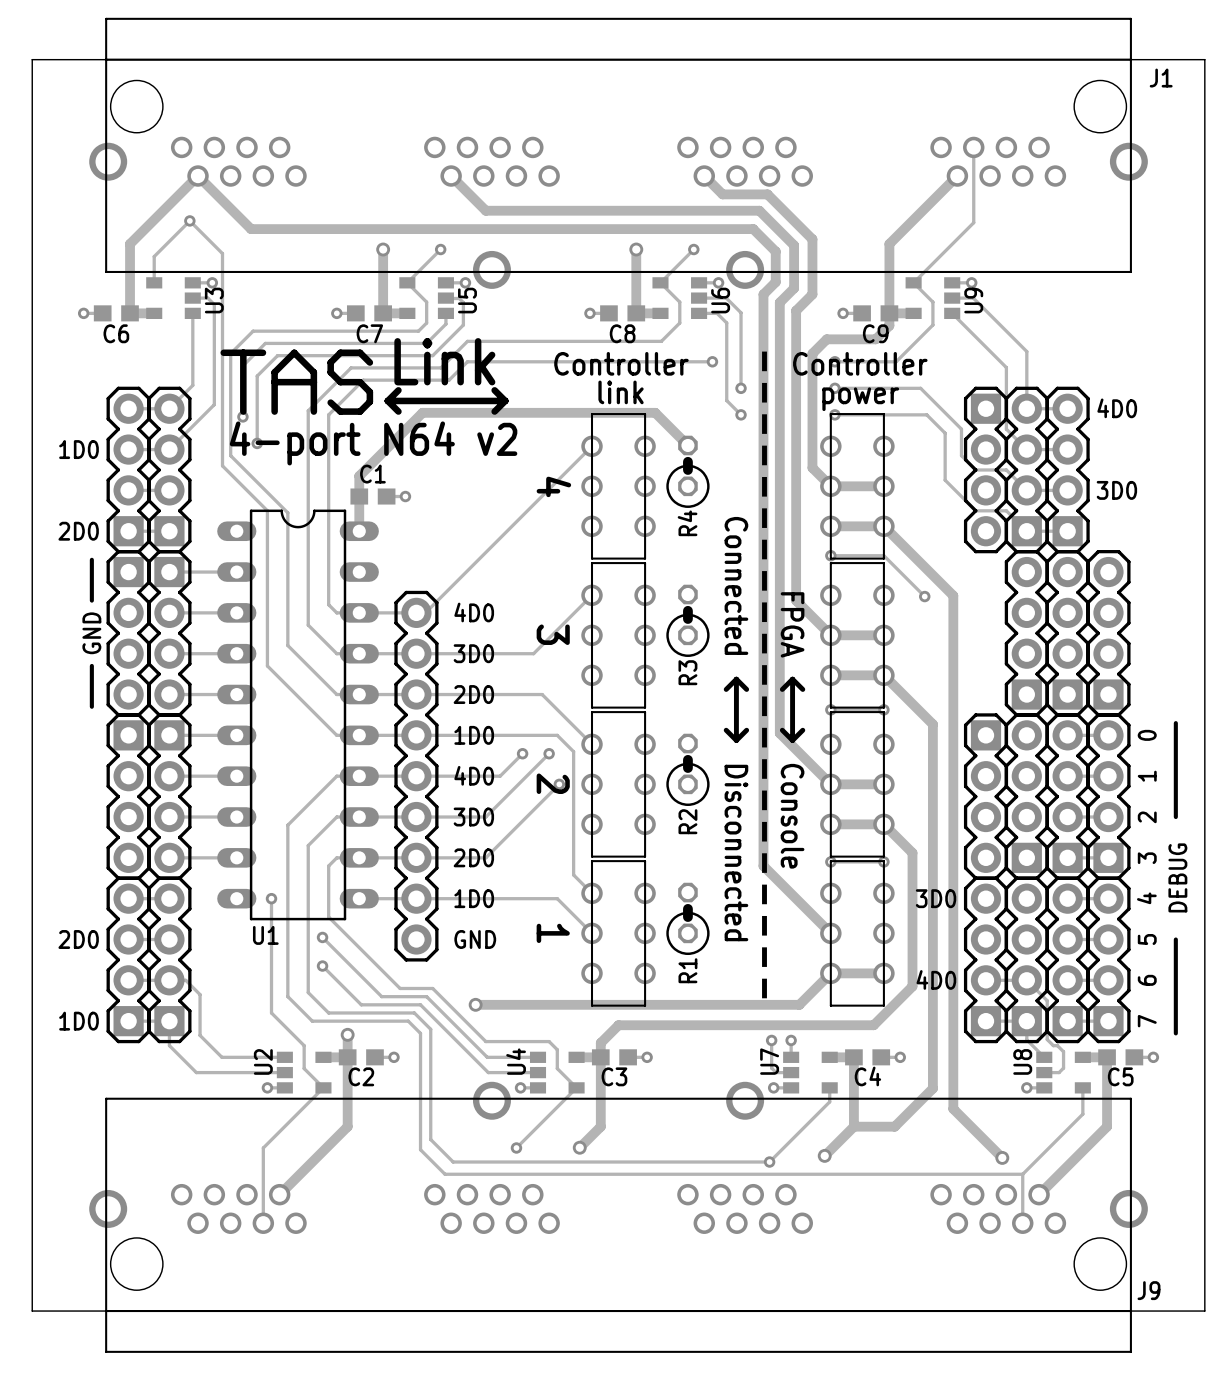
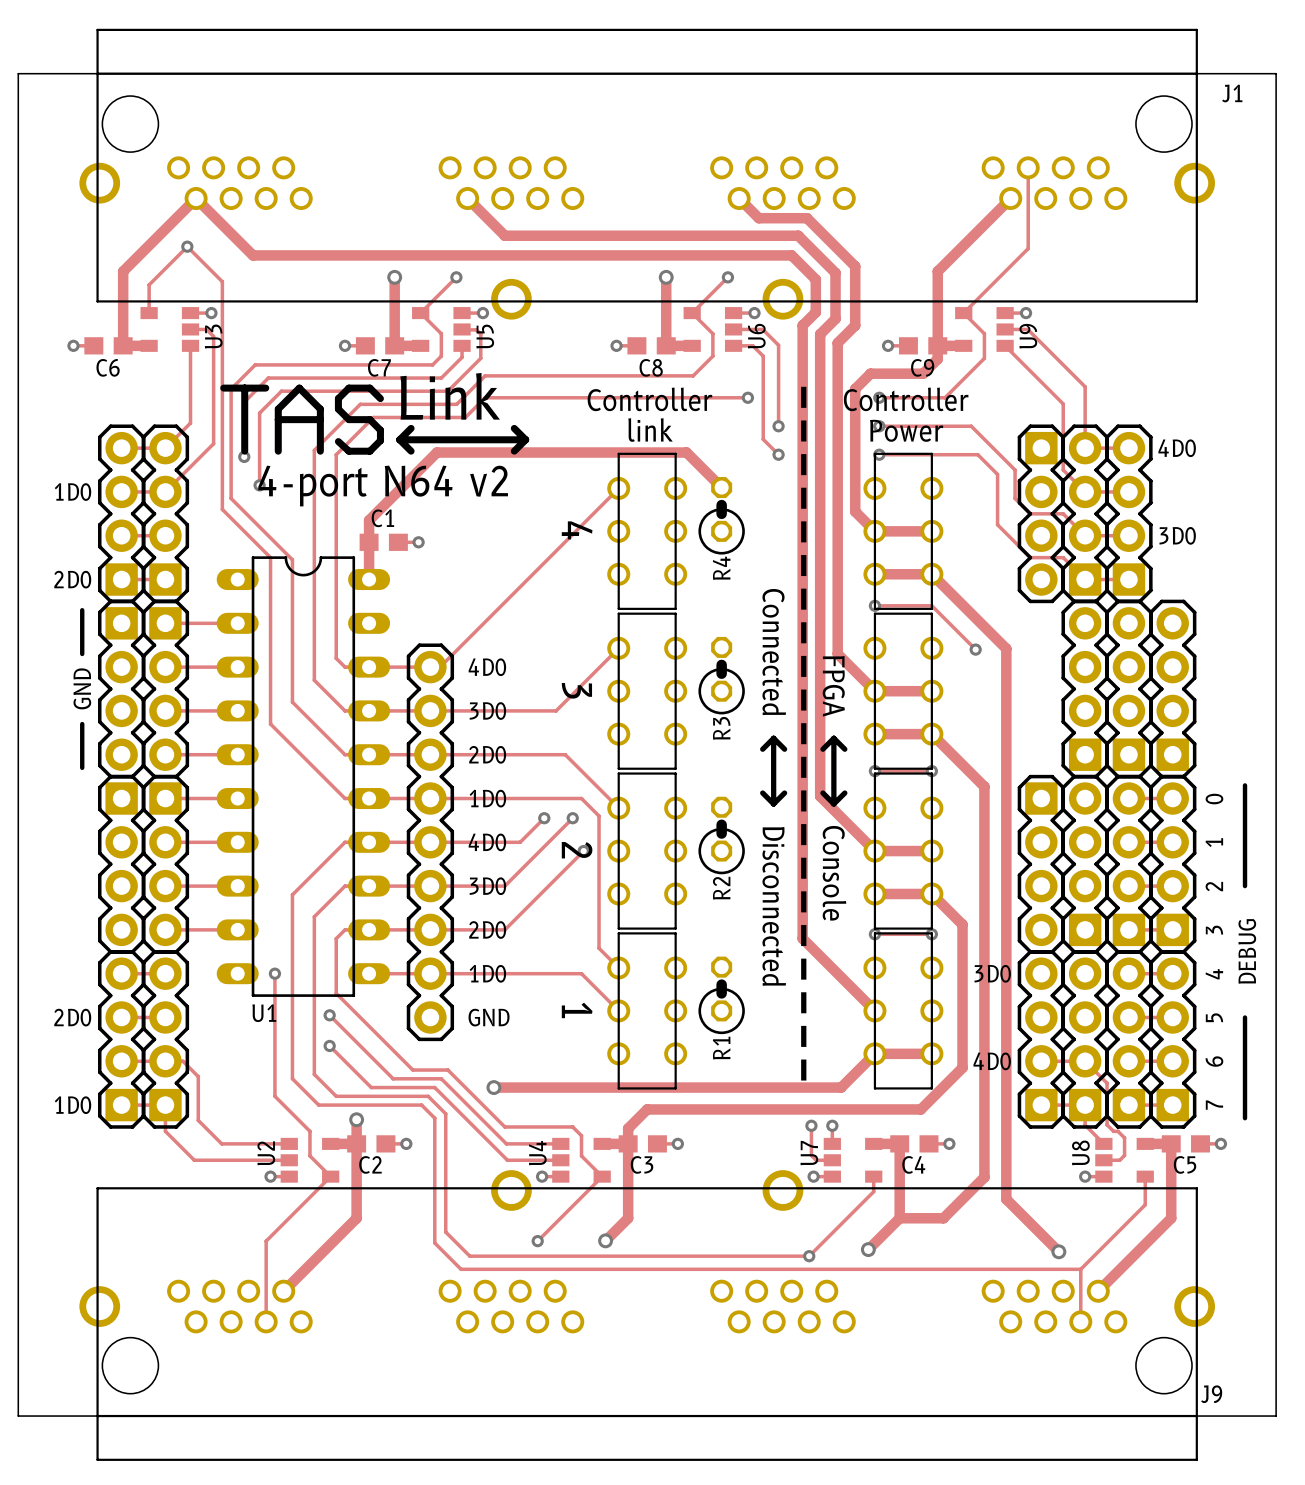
text: power (860, 399) -> Power (906, 430)

